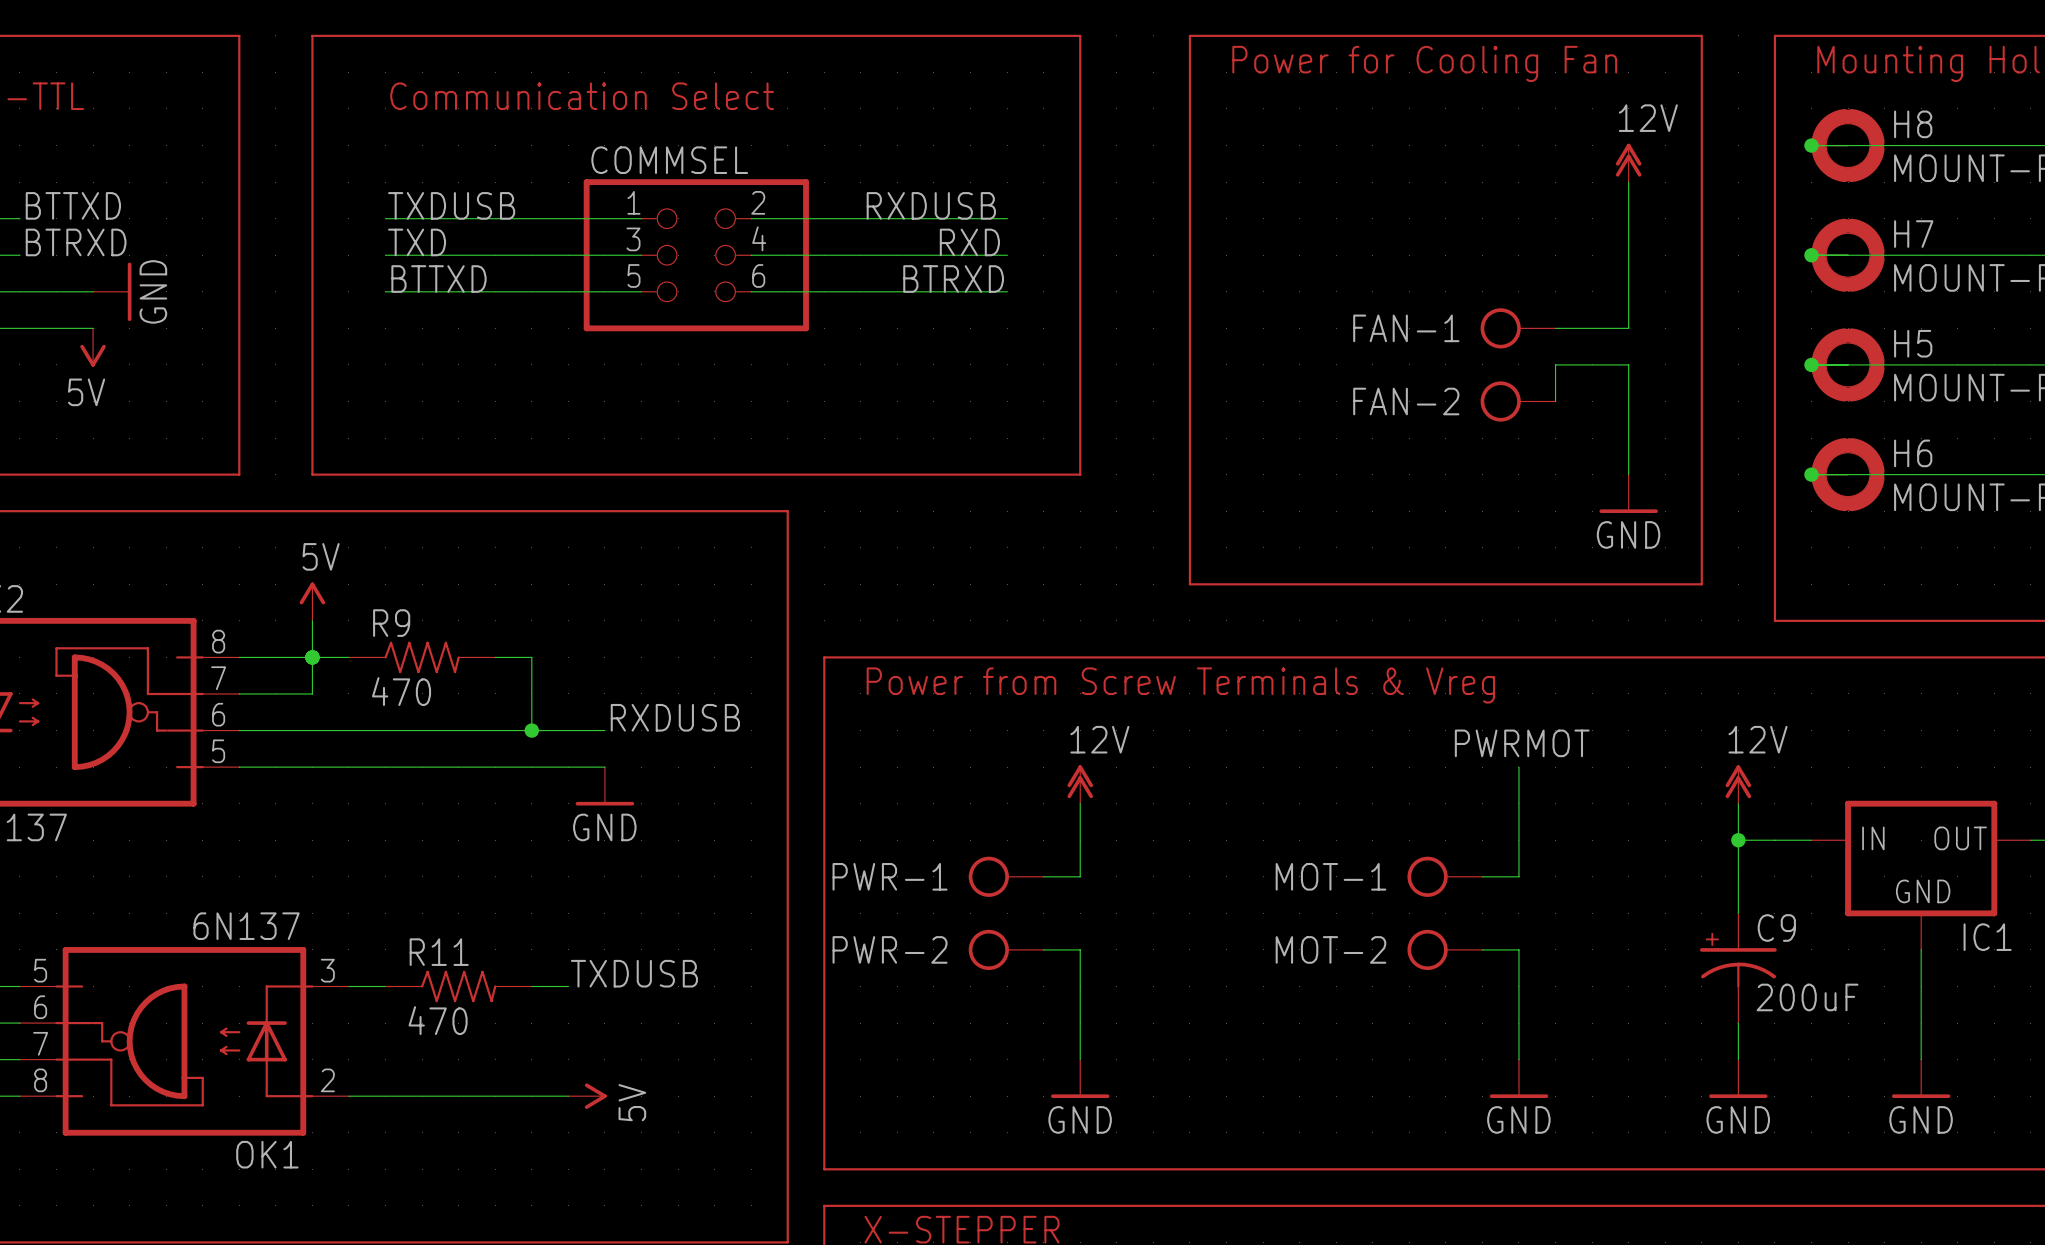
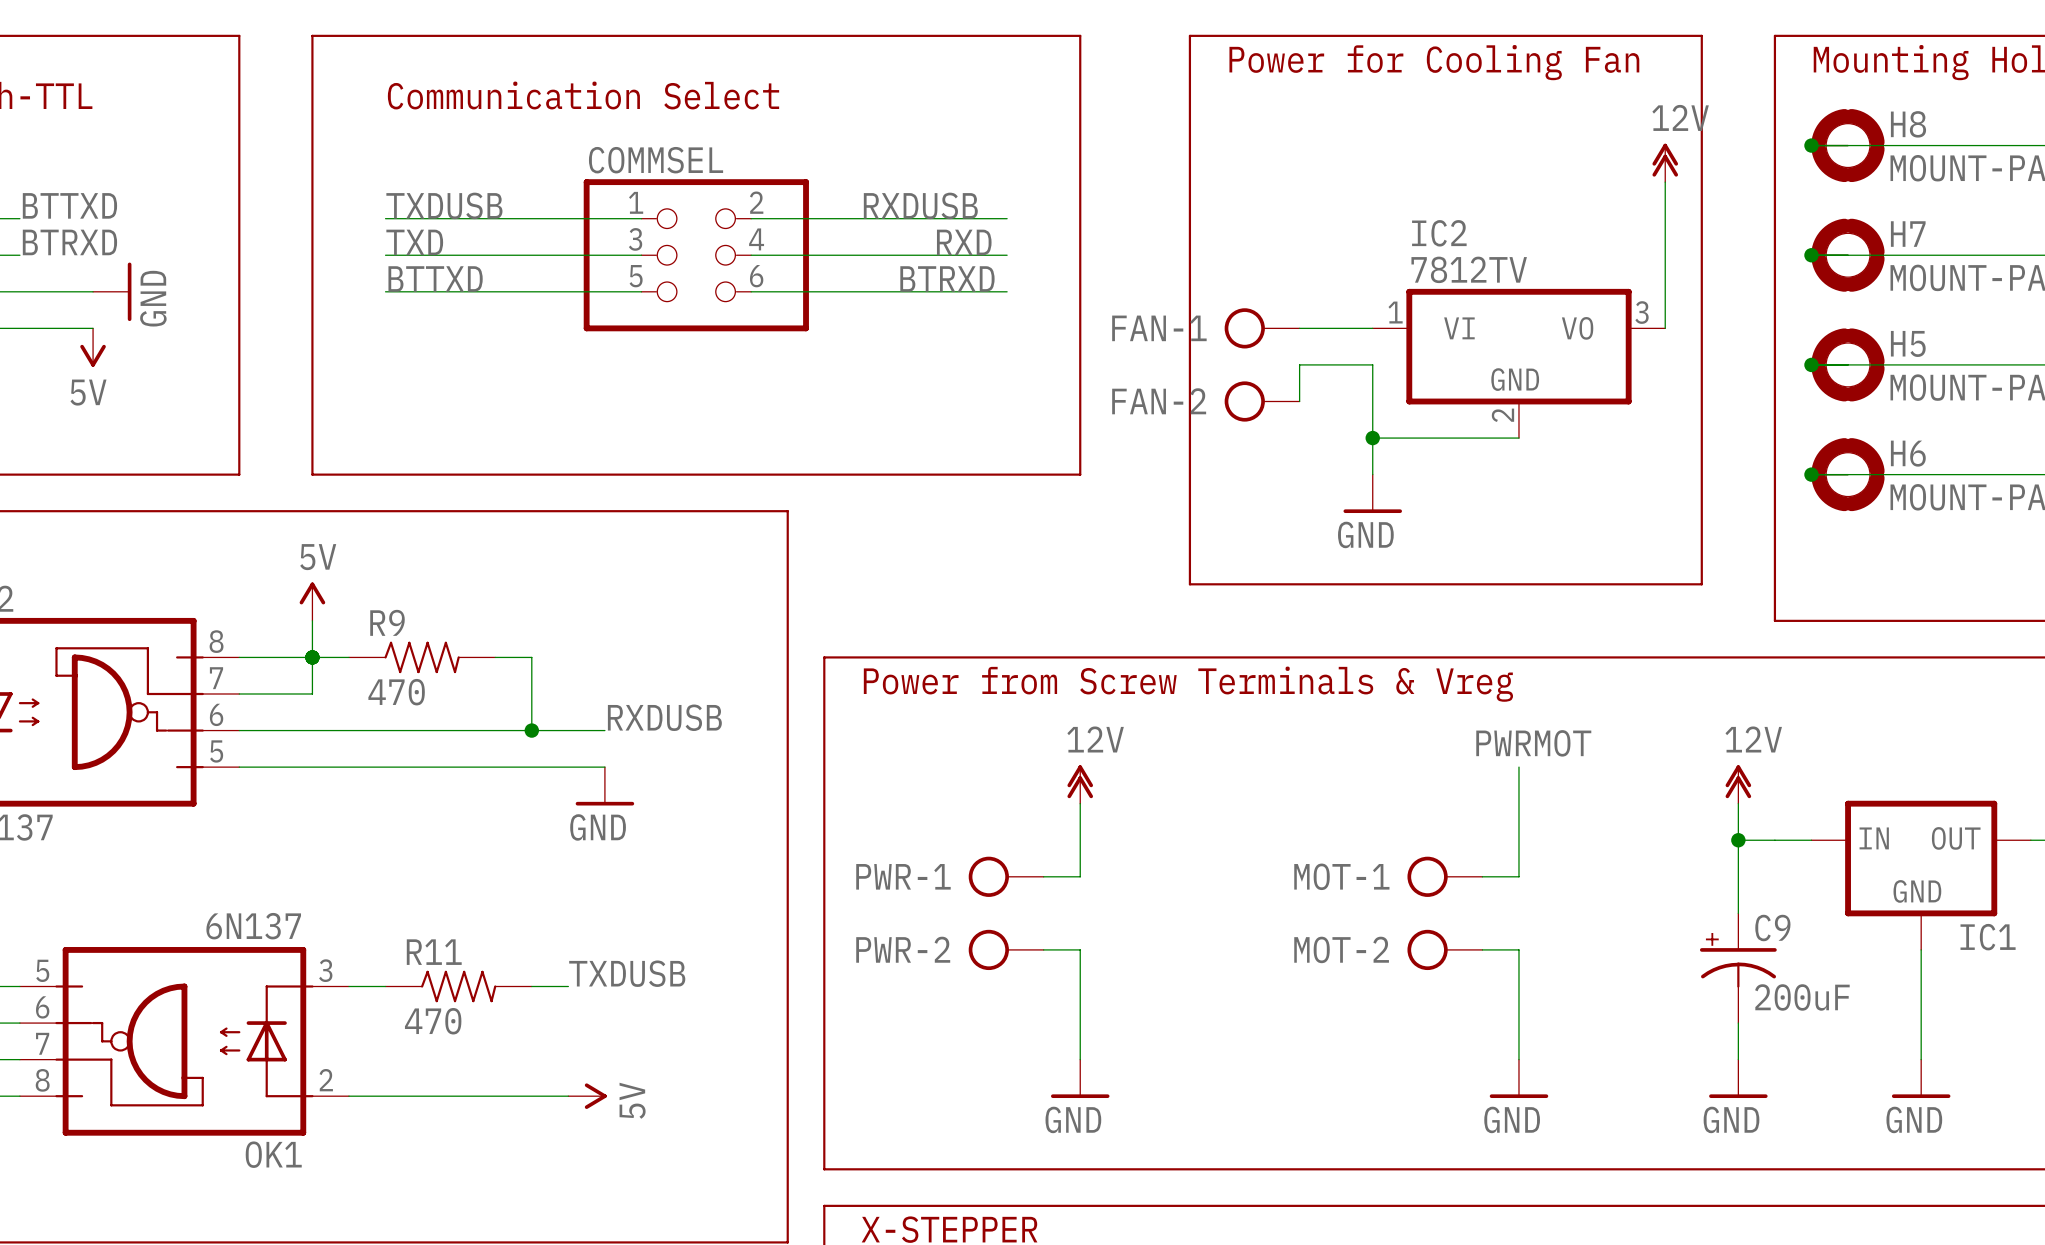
power symbol position: 12V (1628, 162) -> 12V (1665, 162)
wire: (1628, 182) (1628, 328) (1555, 328) -> none
wire: none -> (1665, 182) (1665, 328)
wire: none -> (1299, 328) (1372, 328)
FAN-1 position: (1518, 328) -> (1262, 328)
IC2: none -> 7812TV (1518, 363)
FAN-2 position: (1518, 401) -> (1262, 401)
wire: (1555, 401) (1555, 364) (1628, 364) (1628, 474) -> (1299, 401) (1299, 364) (1372, 364) (1372, 474)
wire: none -> (1372, 438) (1518, 438)
junction: none -> (1372, 438)
power symbol position: GND (1628, 493) -> GND (1372, 493)

